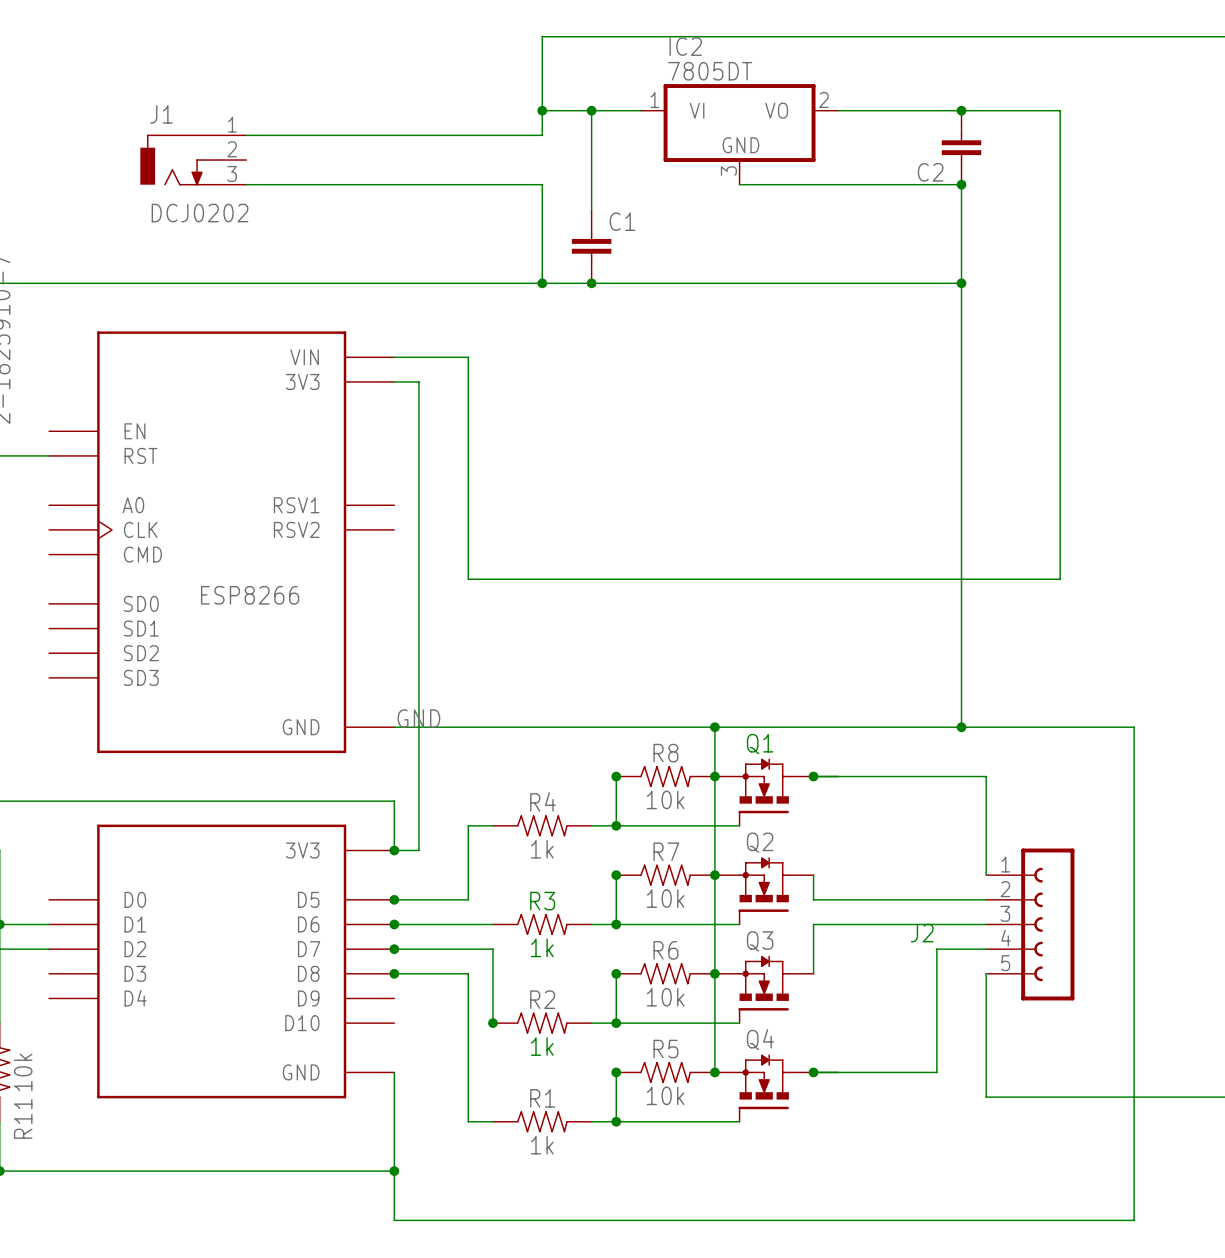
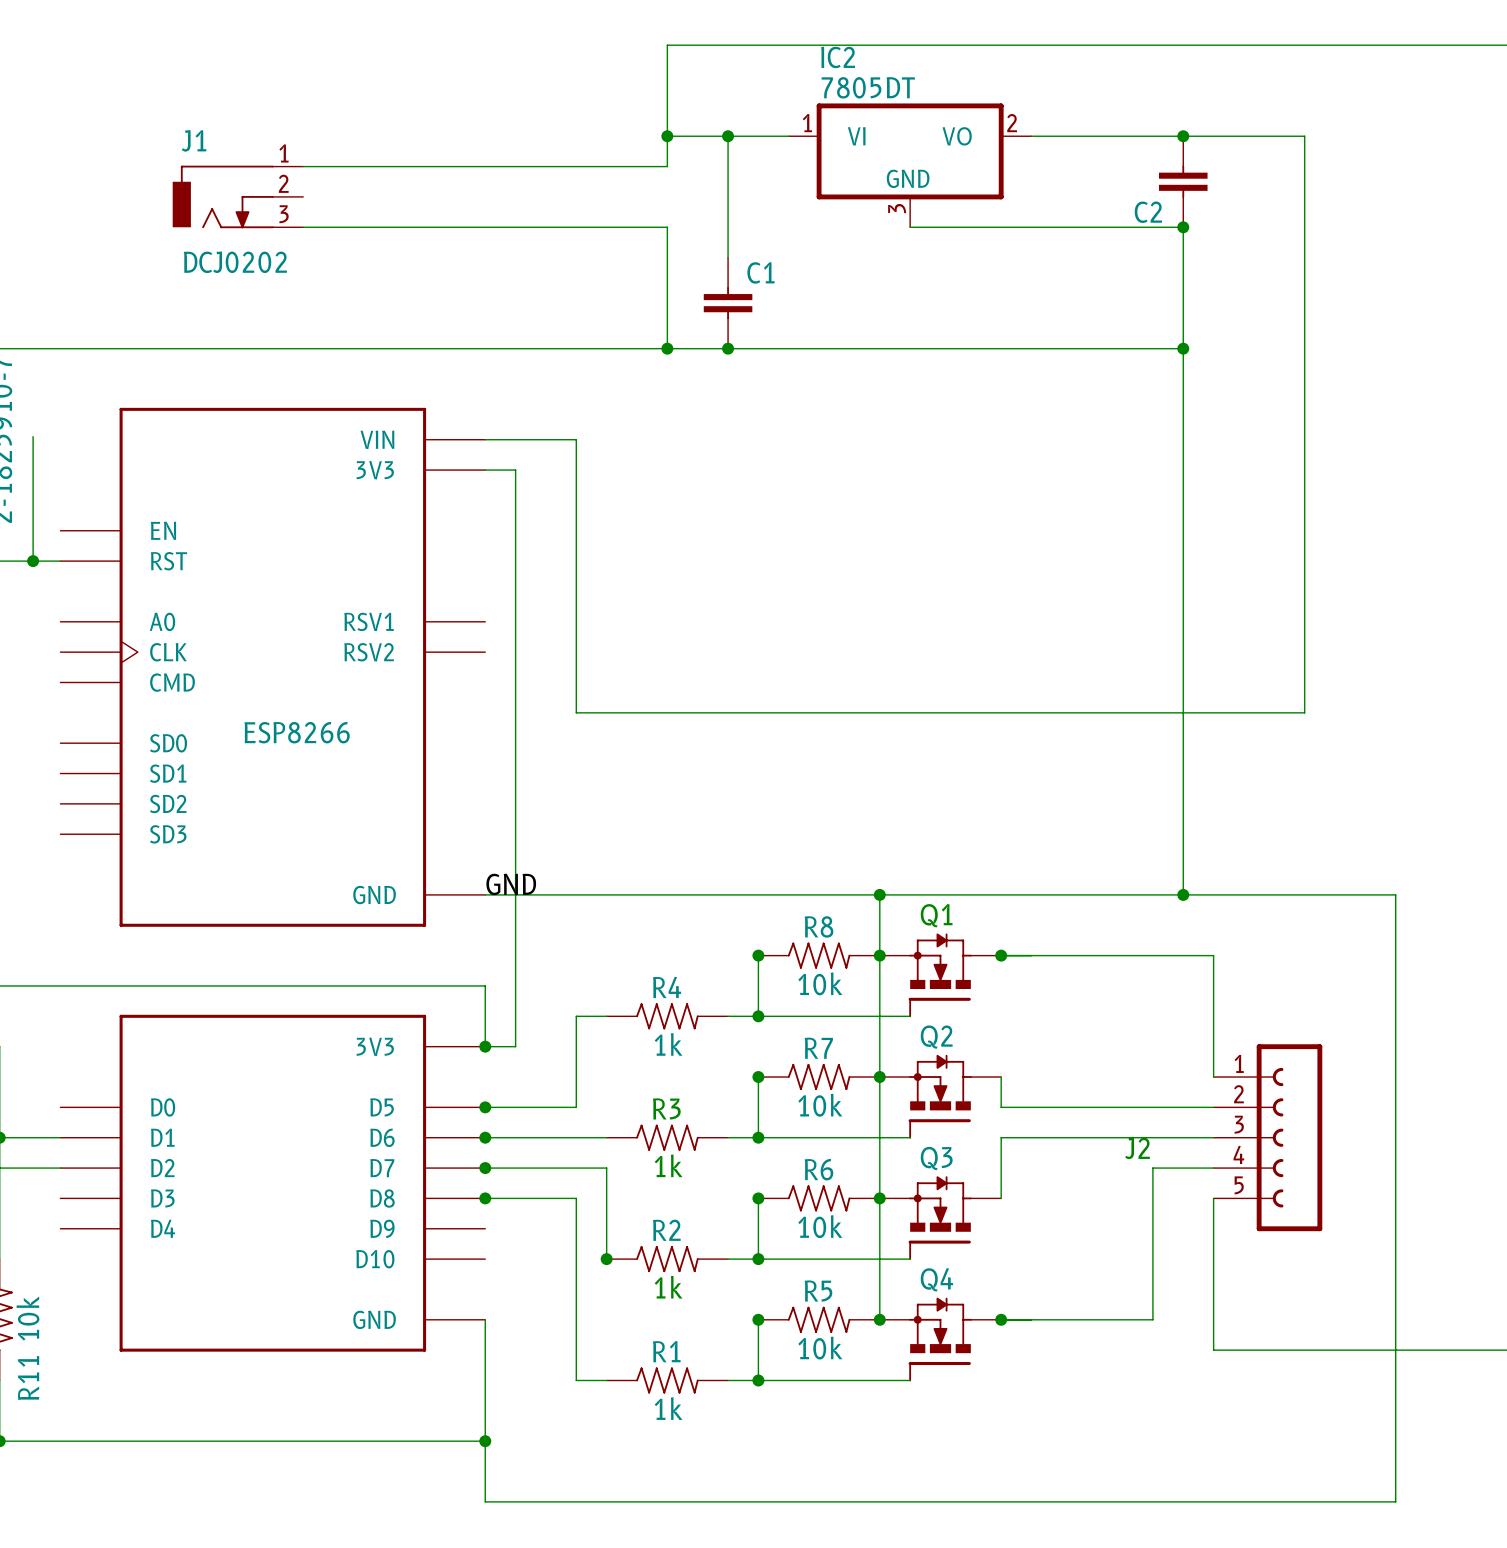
wire: none -> (33, 436) (33, 561)
junction: none -> (33, 561)

